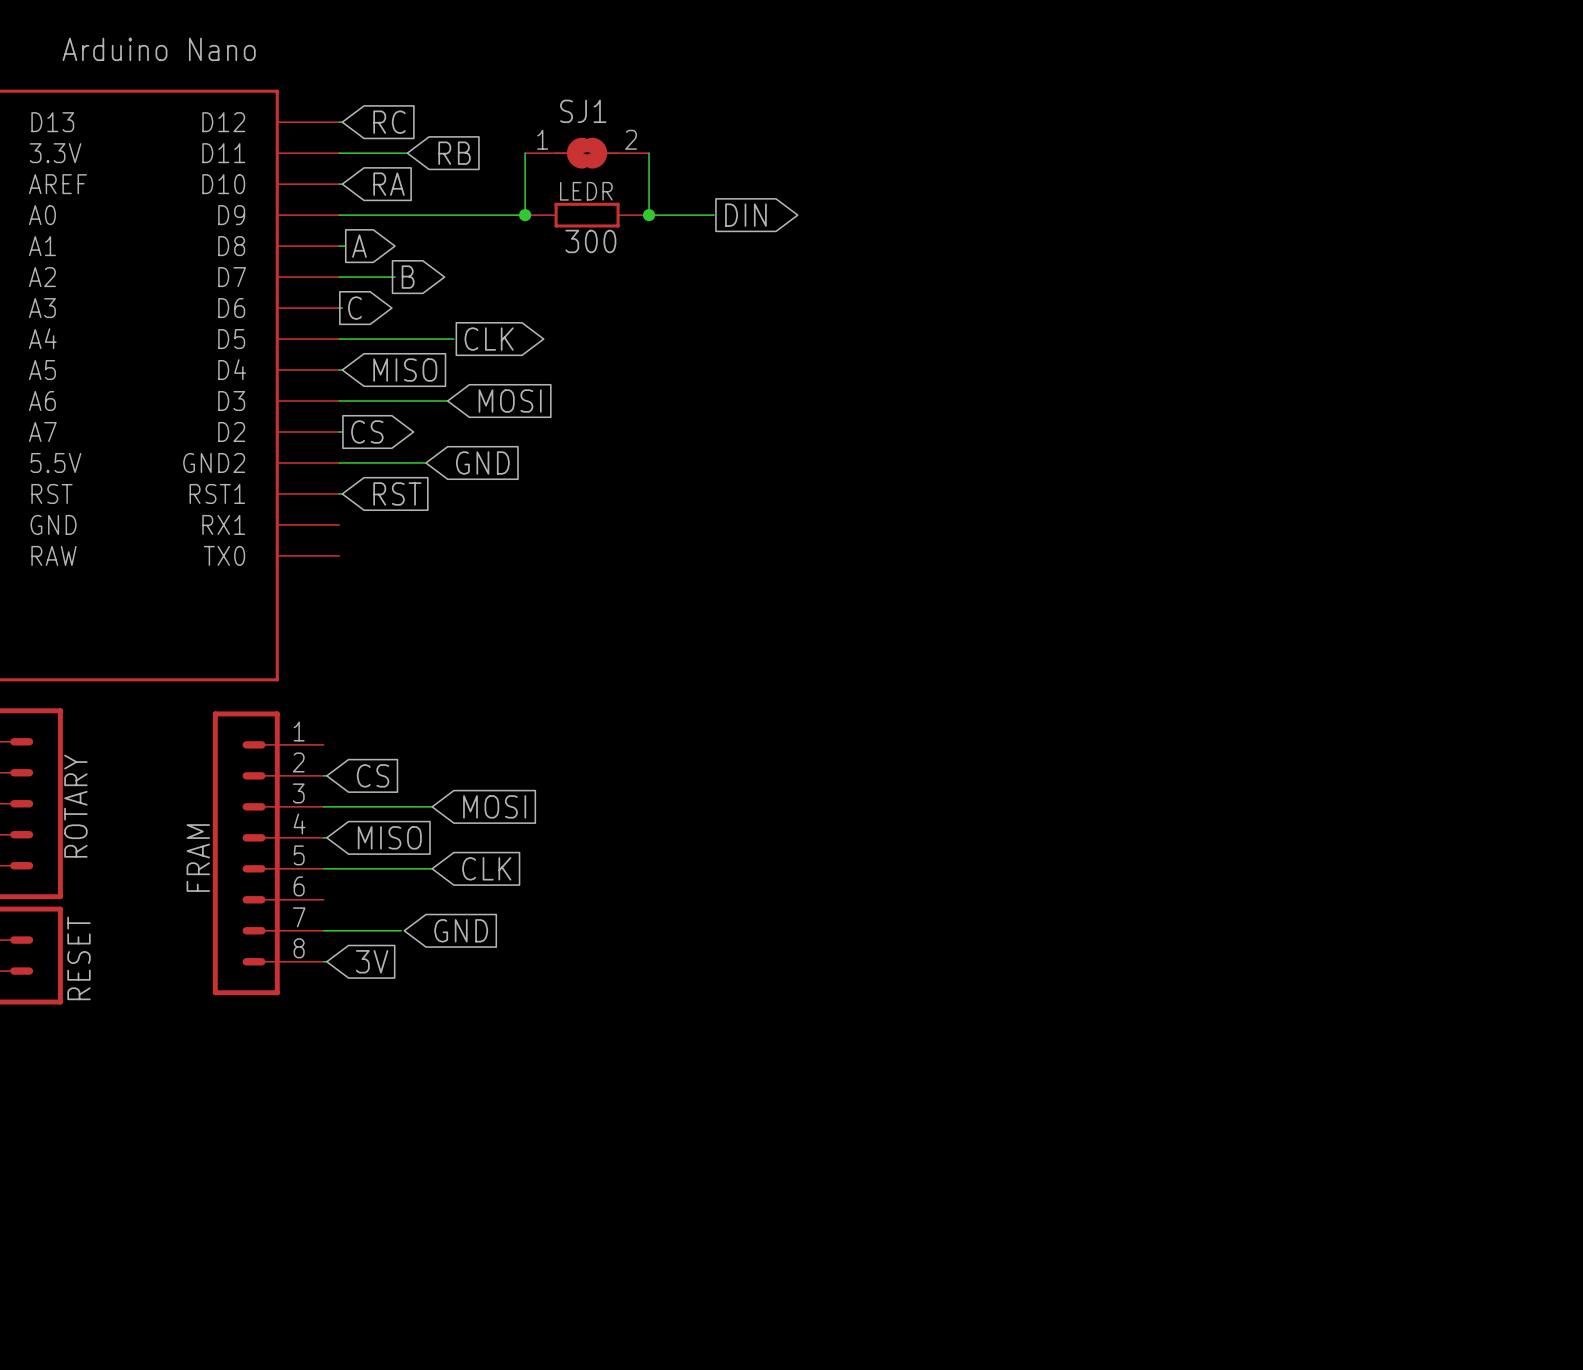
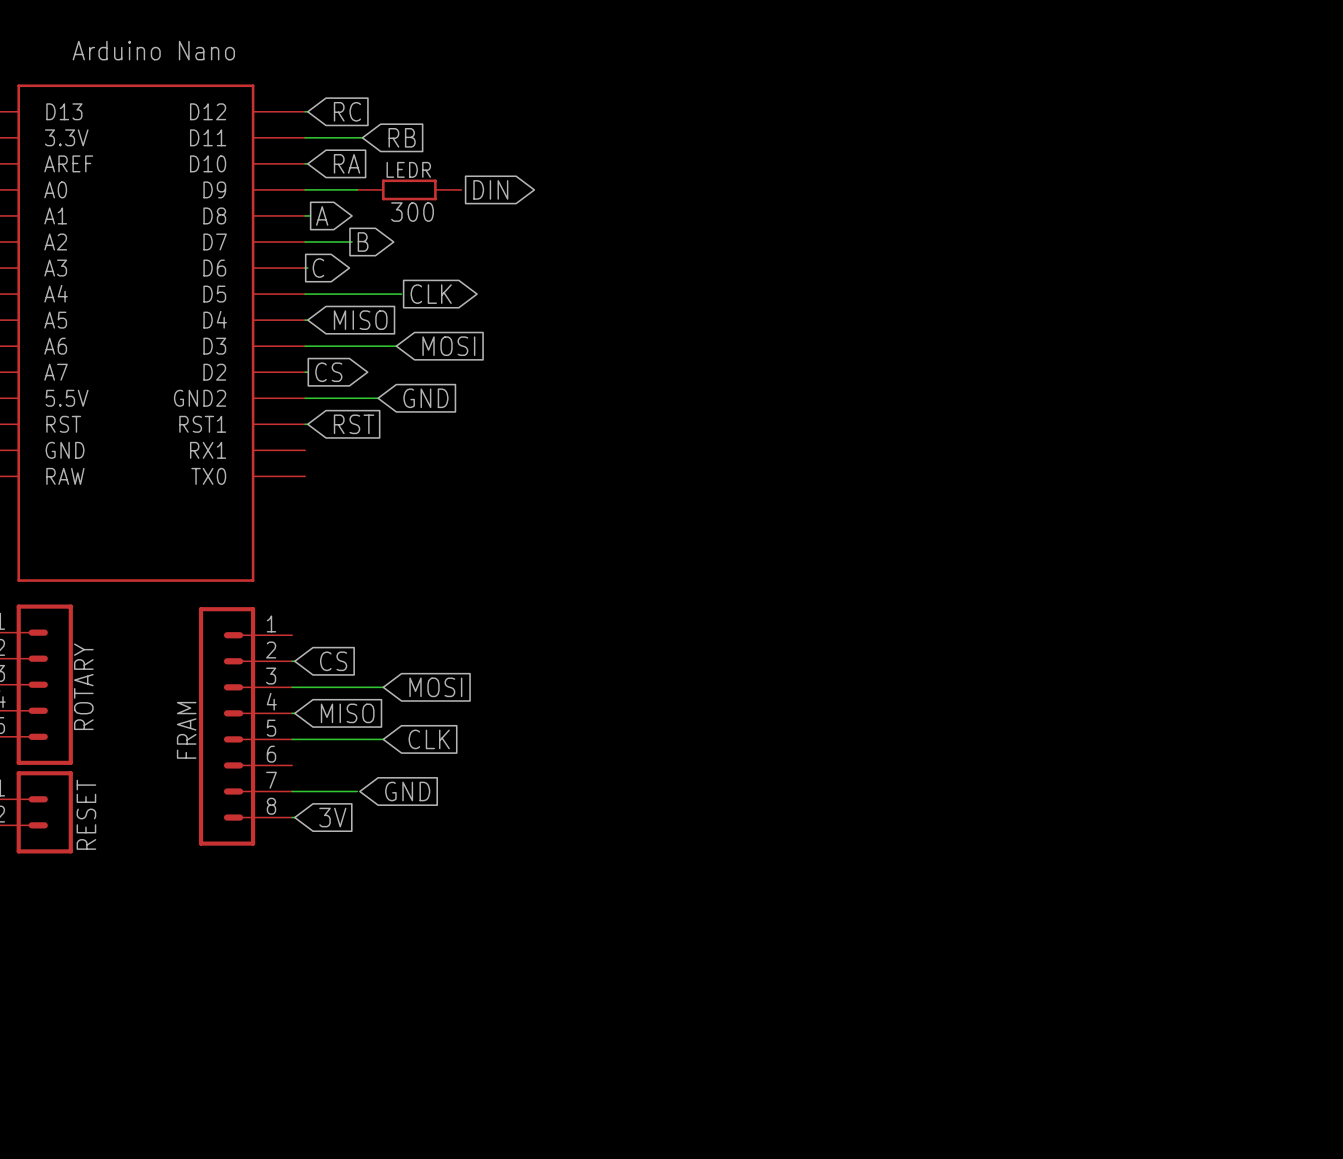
wire: (525, 153) (525, 215) (401, 215) -> none
SJ1: (587, 153) -> none
wire: (649, 153) (649, 215) (714, 215) -> none
junction: (525, 215) -> none
LEDR position: (587, 215) -> (409, 189)
junction: (649, 215) -> none
global label position: DIN (745, 215) -> DIN (490, 189)

